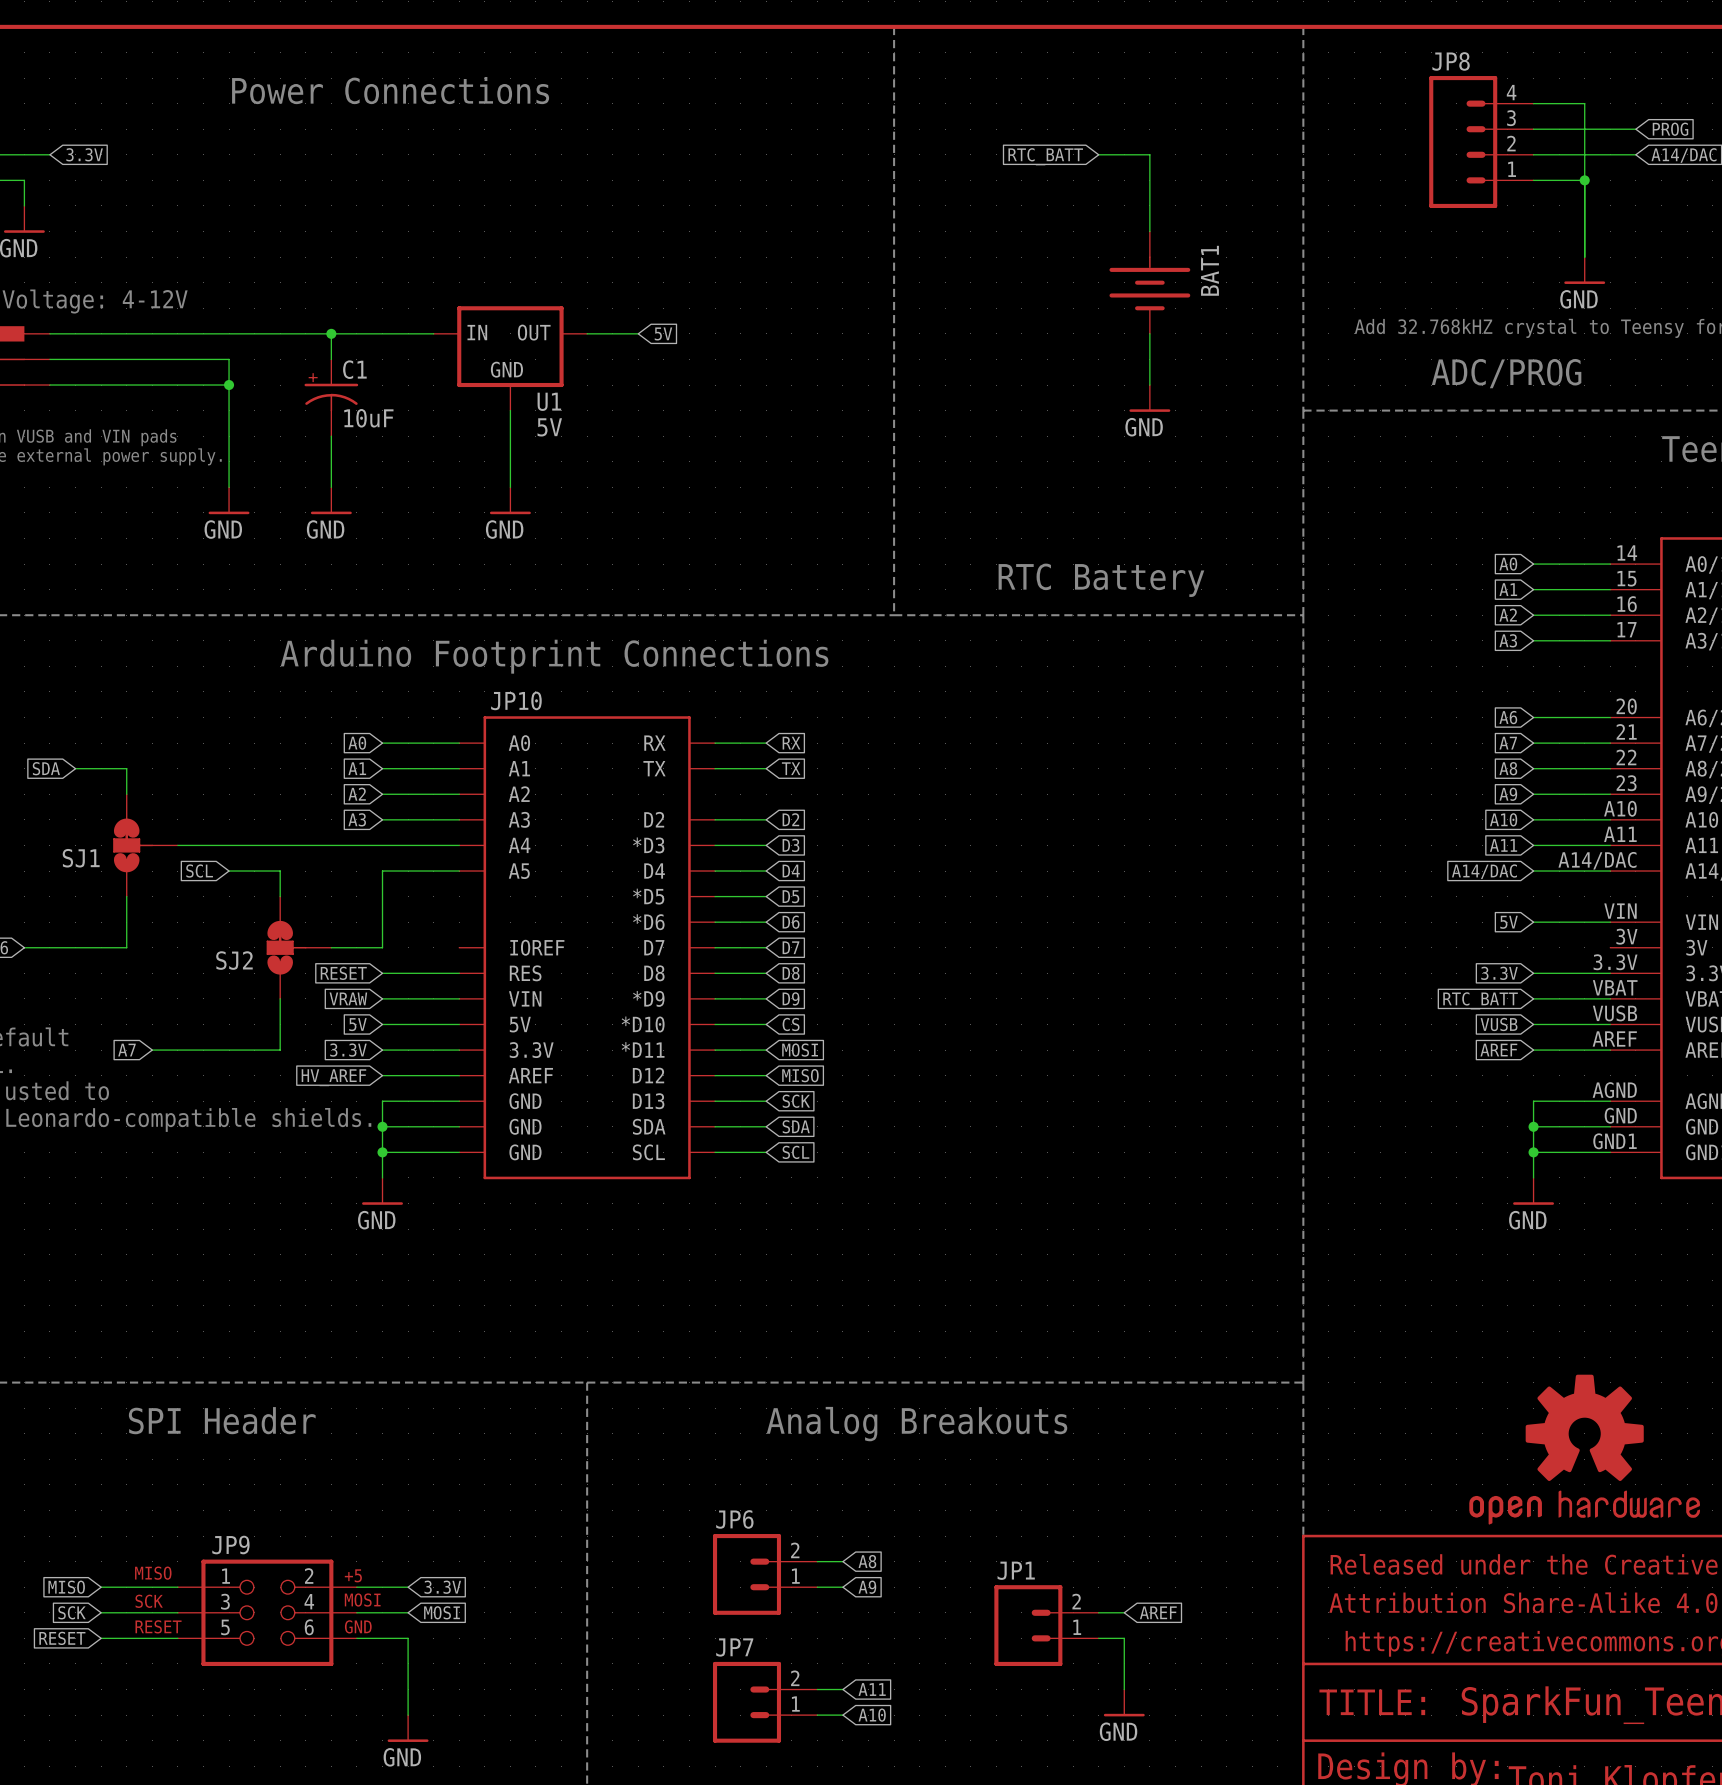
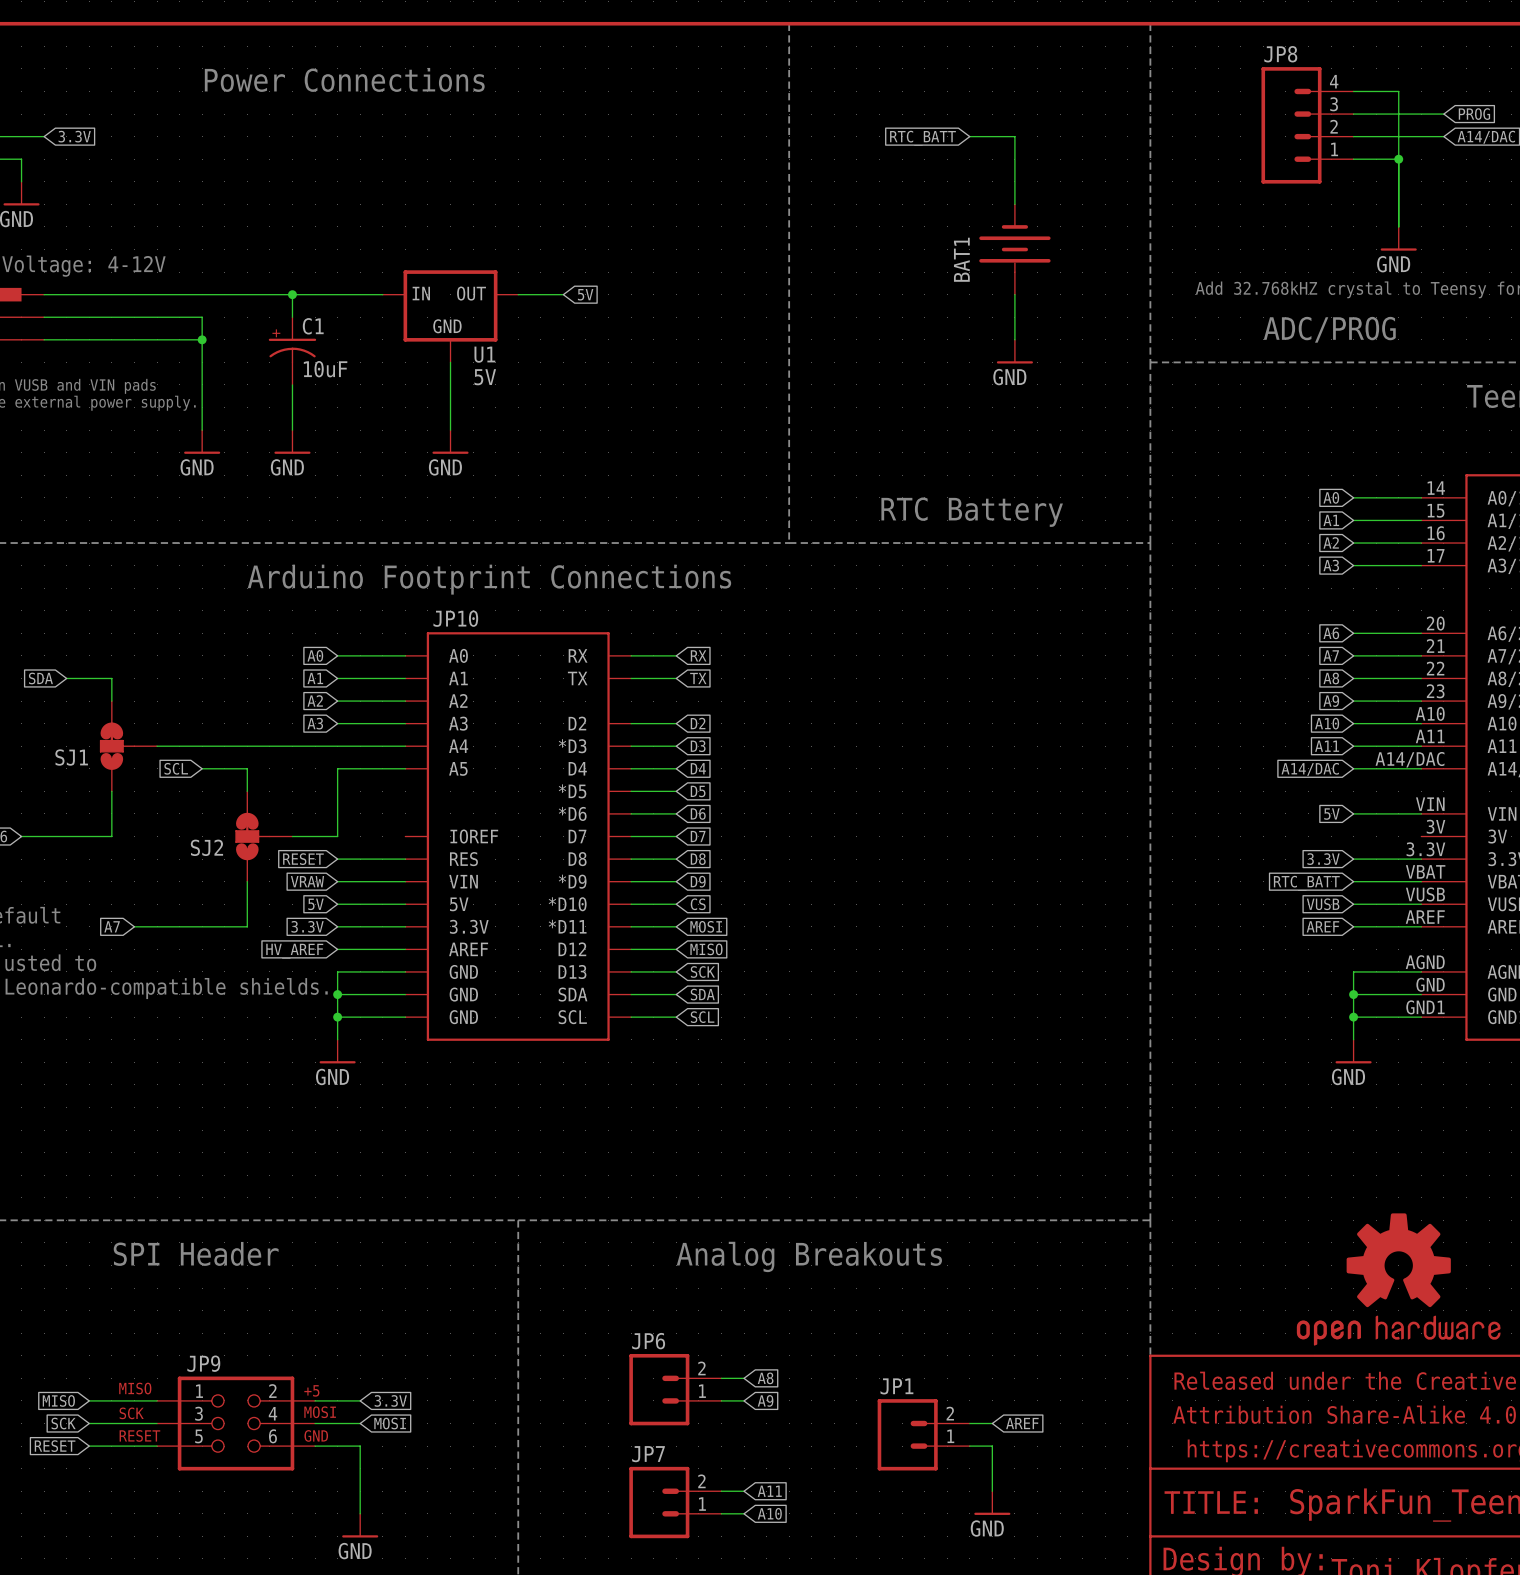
BAT1 rotation: 0° (1149, 283) -> 180° (1014, 248)

